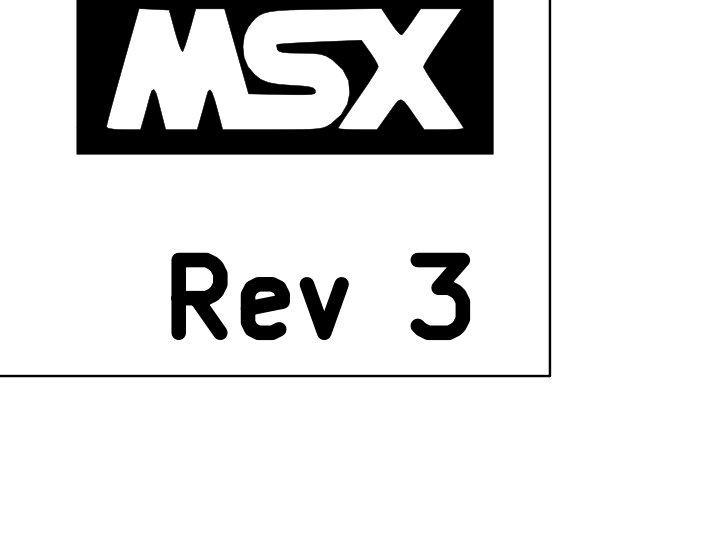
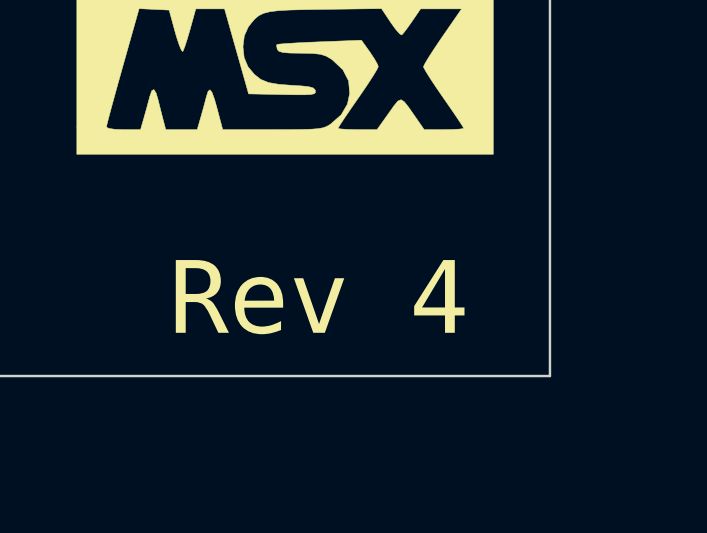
text: Rev 3 (320, 296) -> Rev 4 (320, 297)

